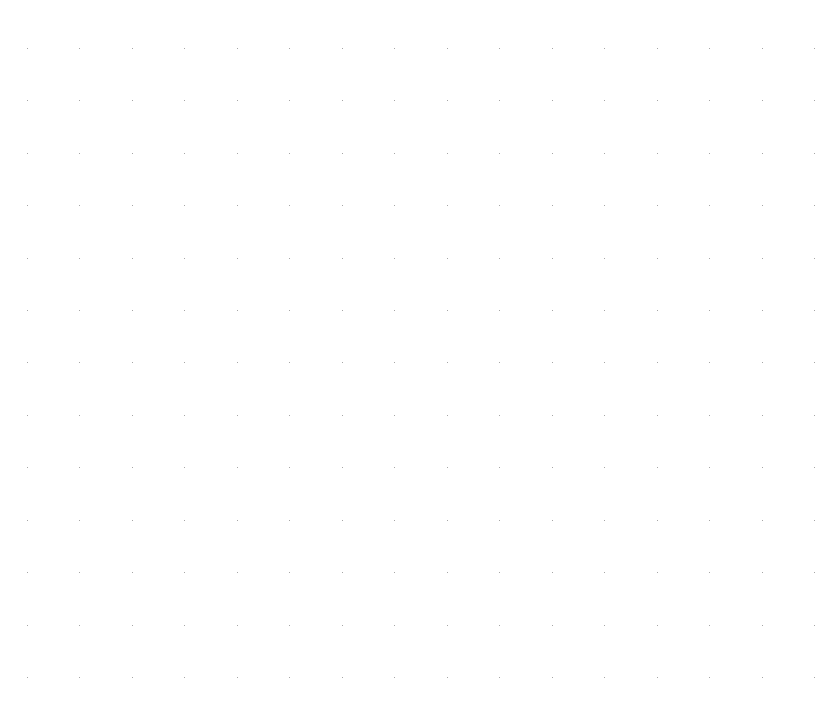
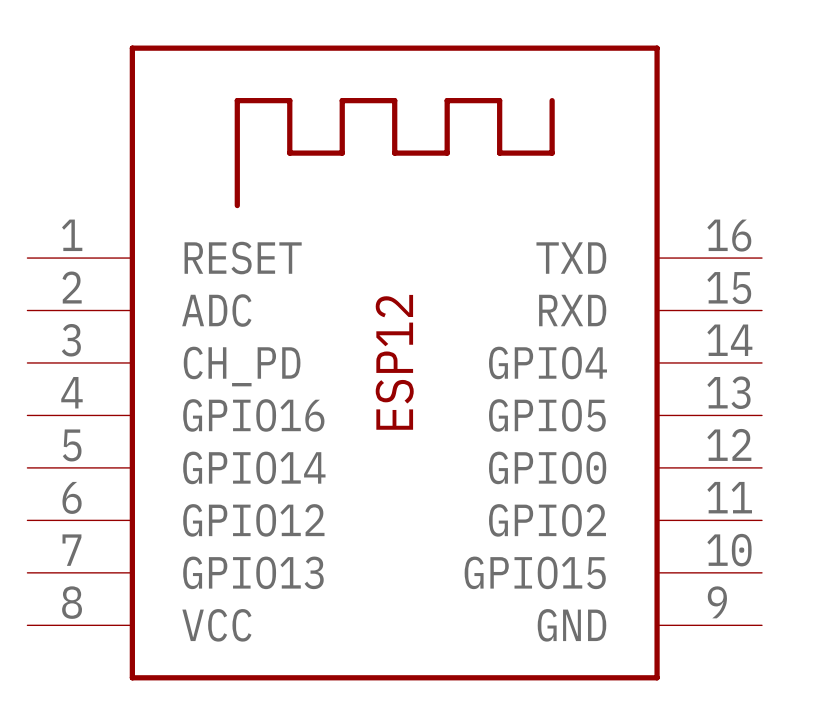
part: none -> (394, 362)

